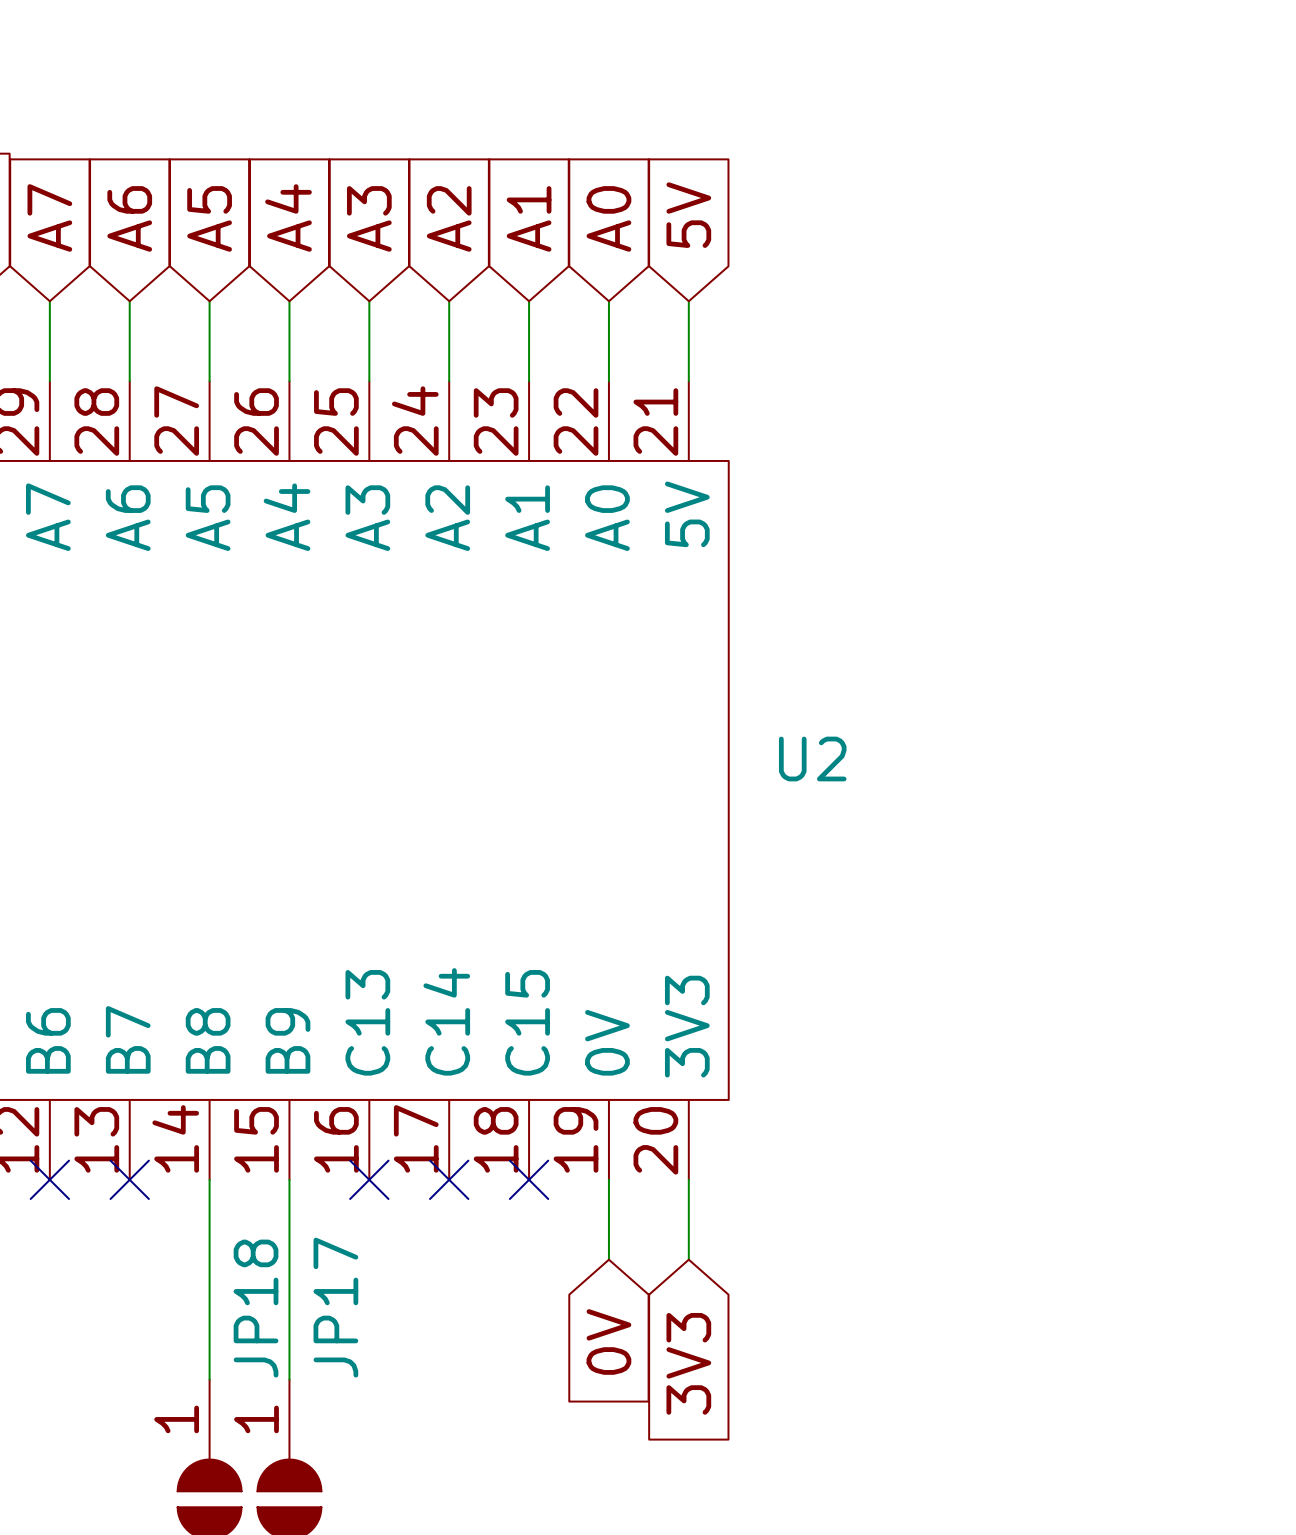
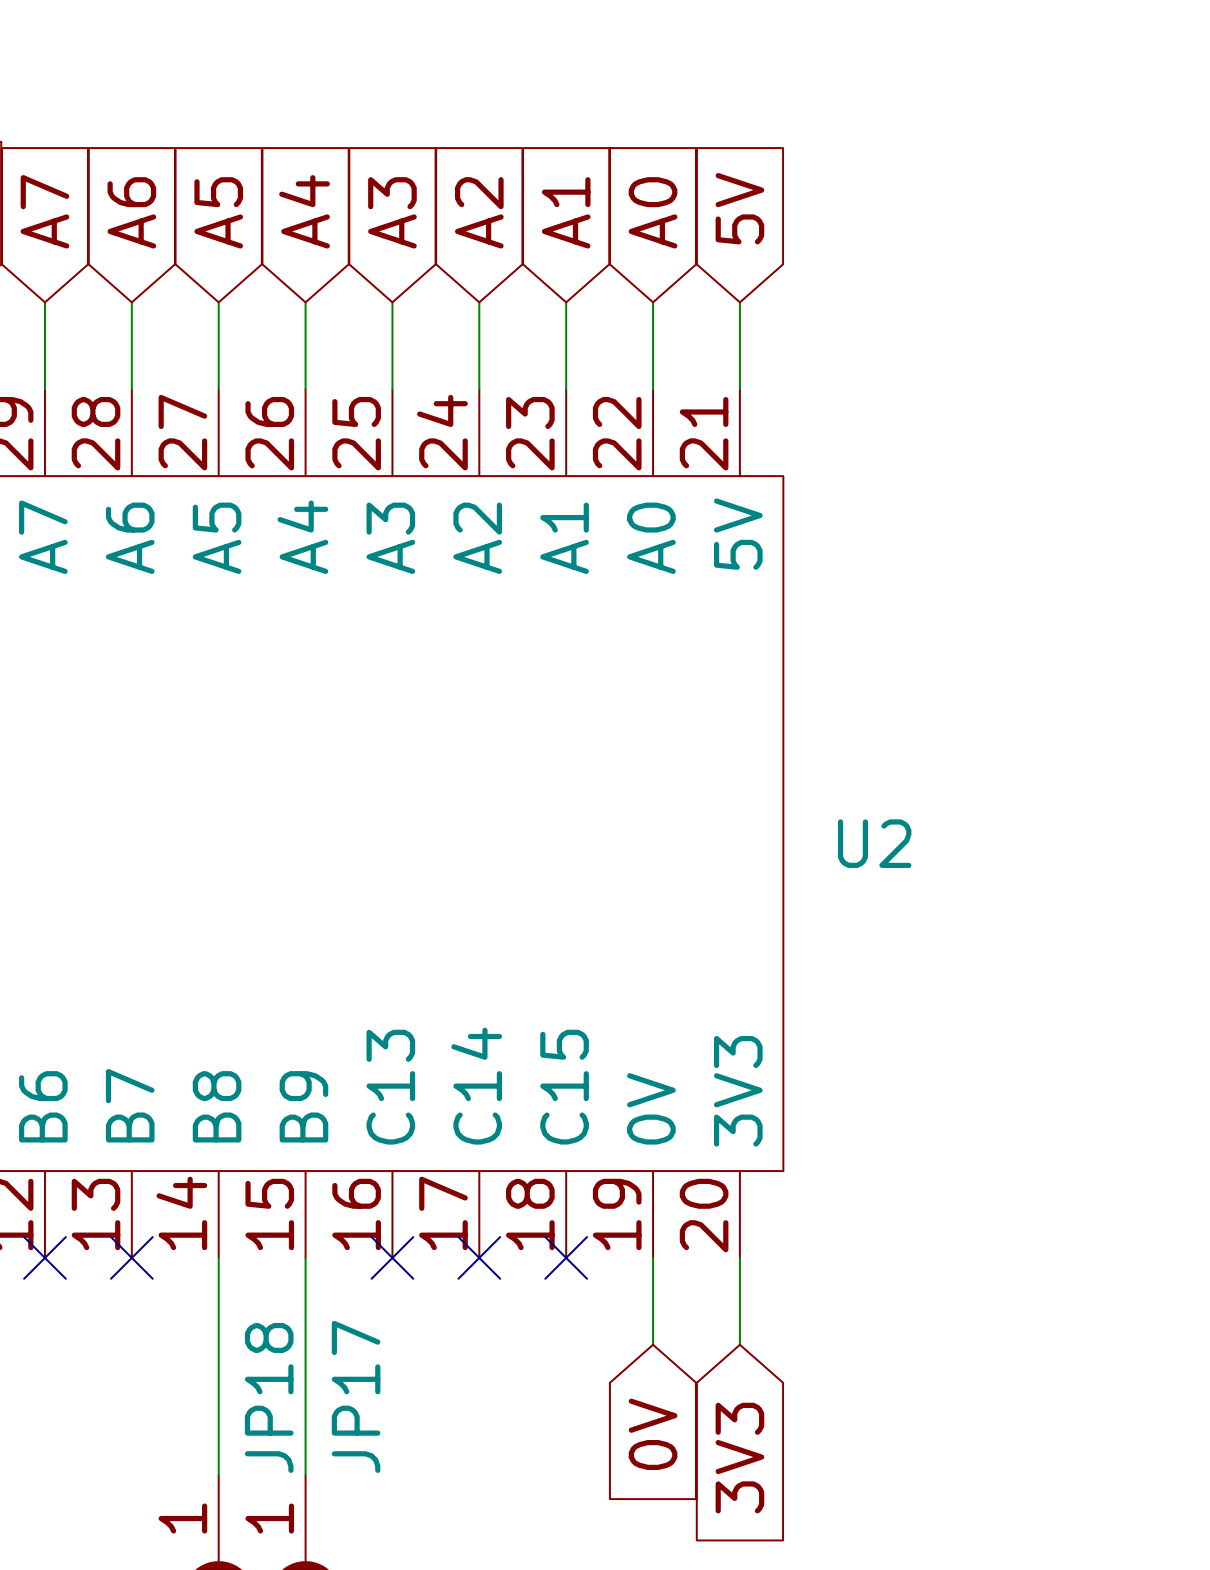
U2 name position: U2 (812, 759) -> U2 (874, 843)

